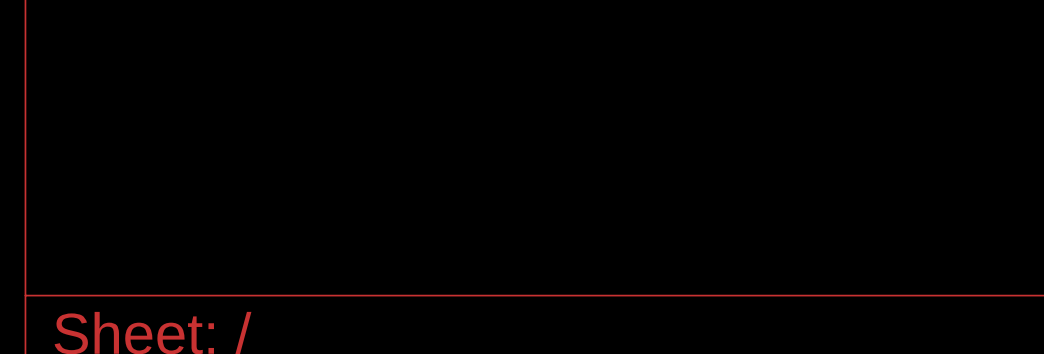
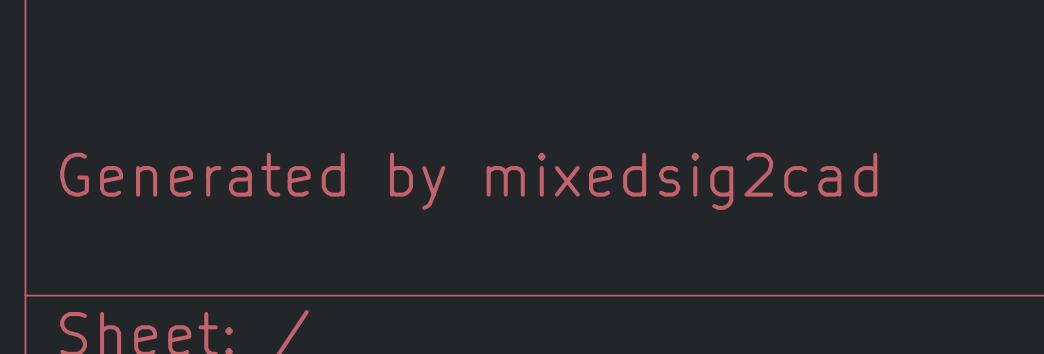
title block: none -> Generated by mixedsig2cad (468, 181)

